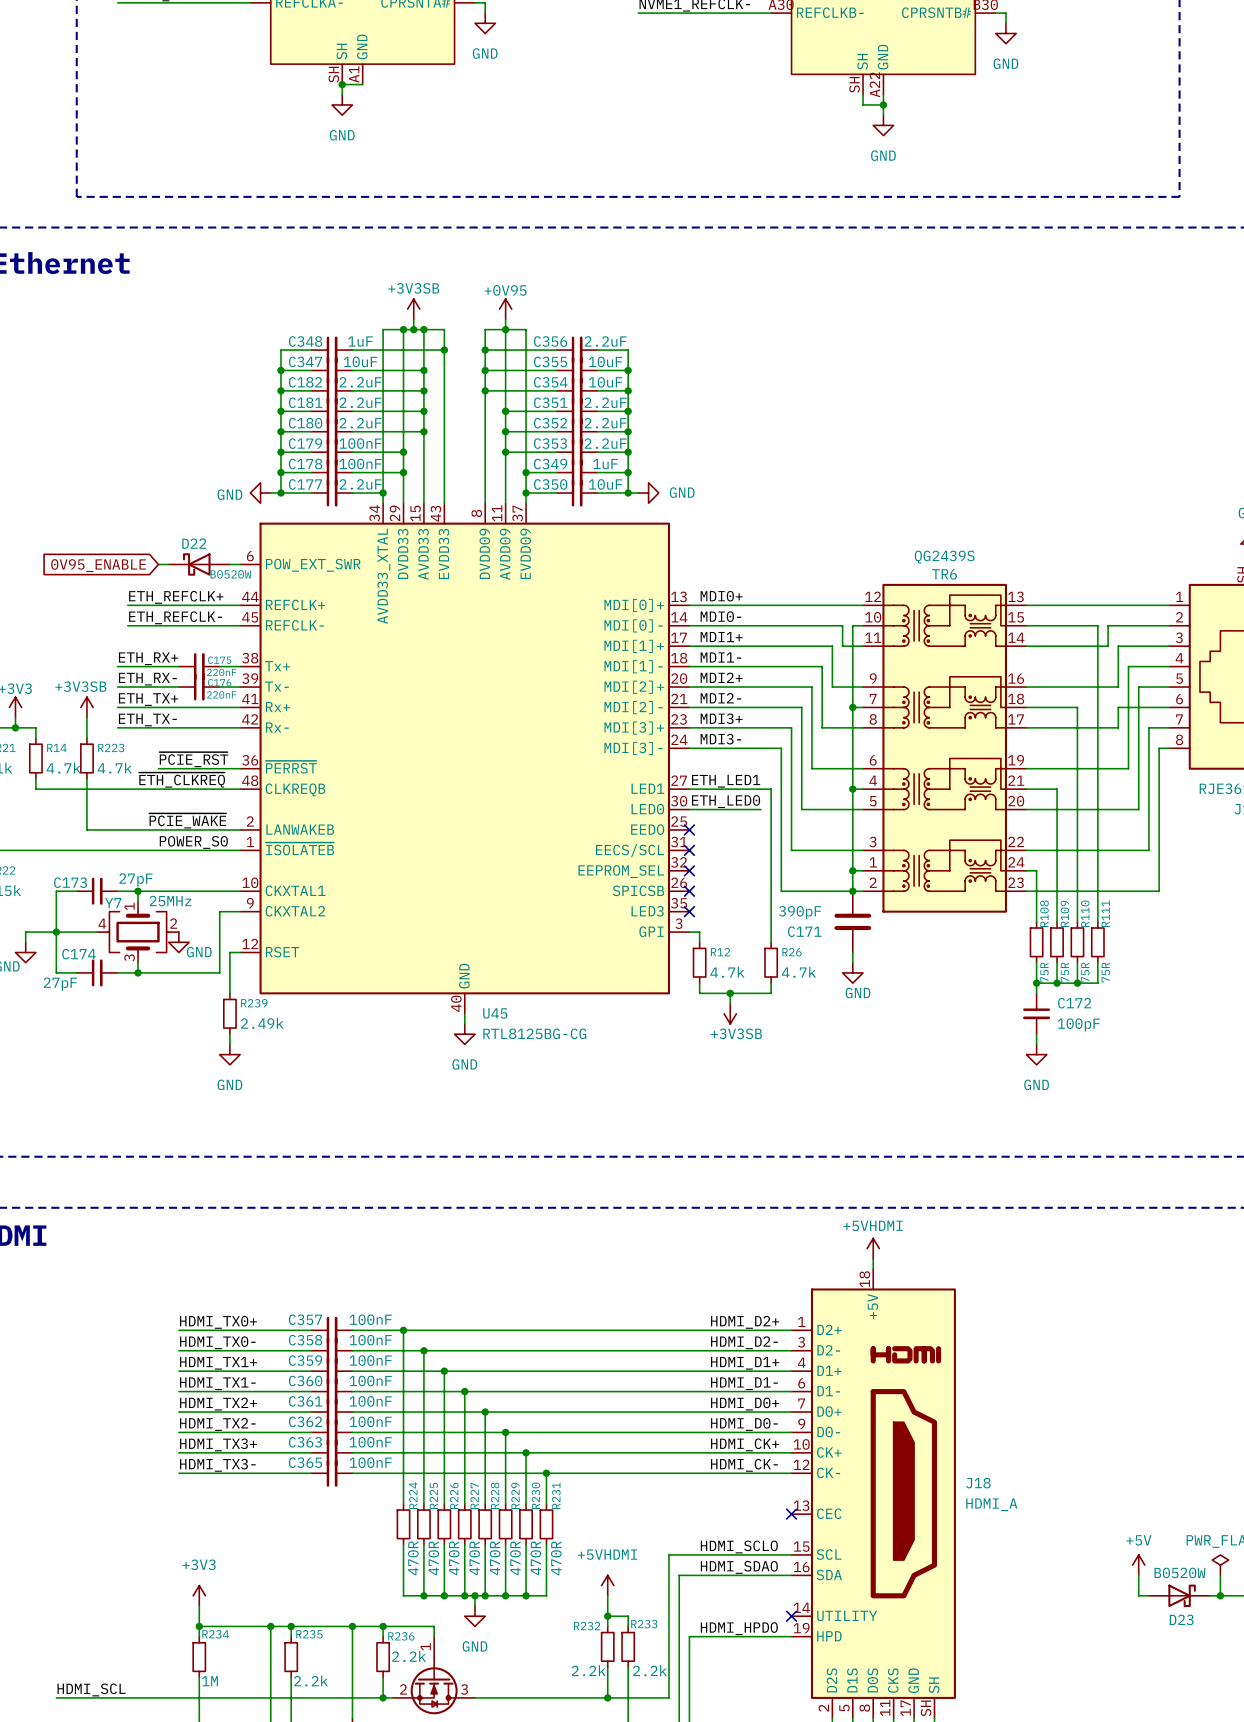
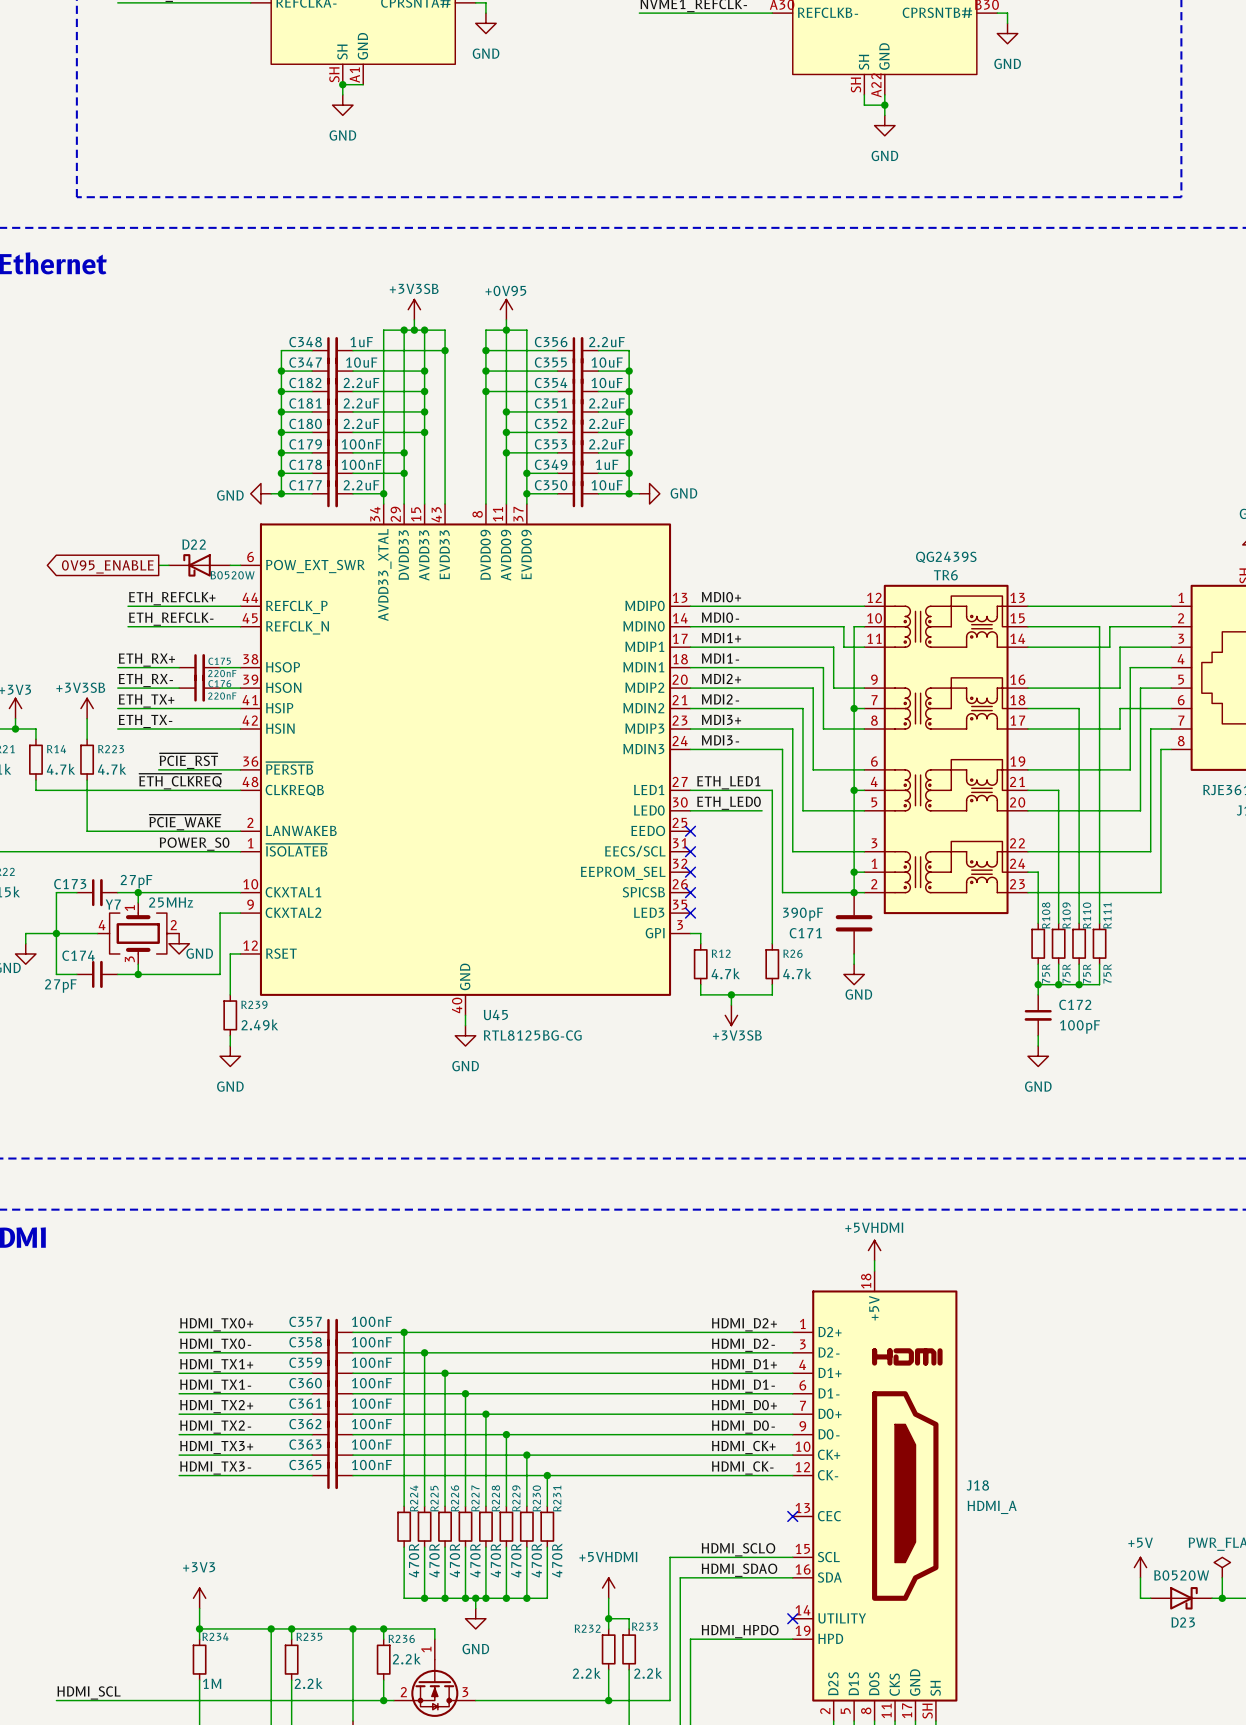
U45 symbol: [240, 503, 690, 1014] -> [240, 504, 691, 1016]
global label shape: input (98, 565) -> output (107, 566)

